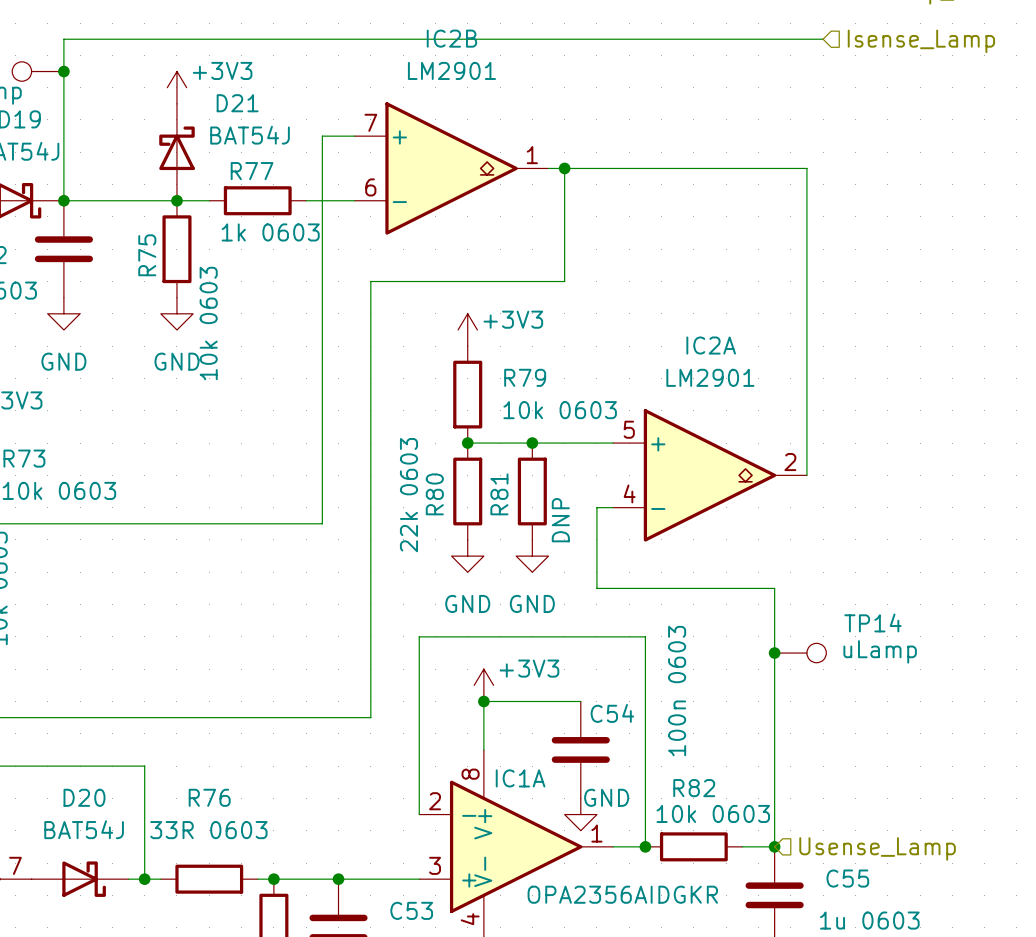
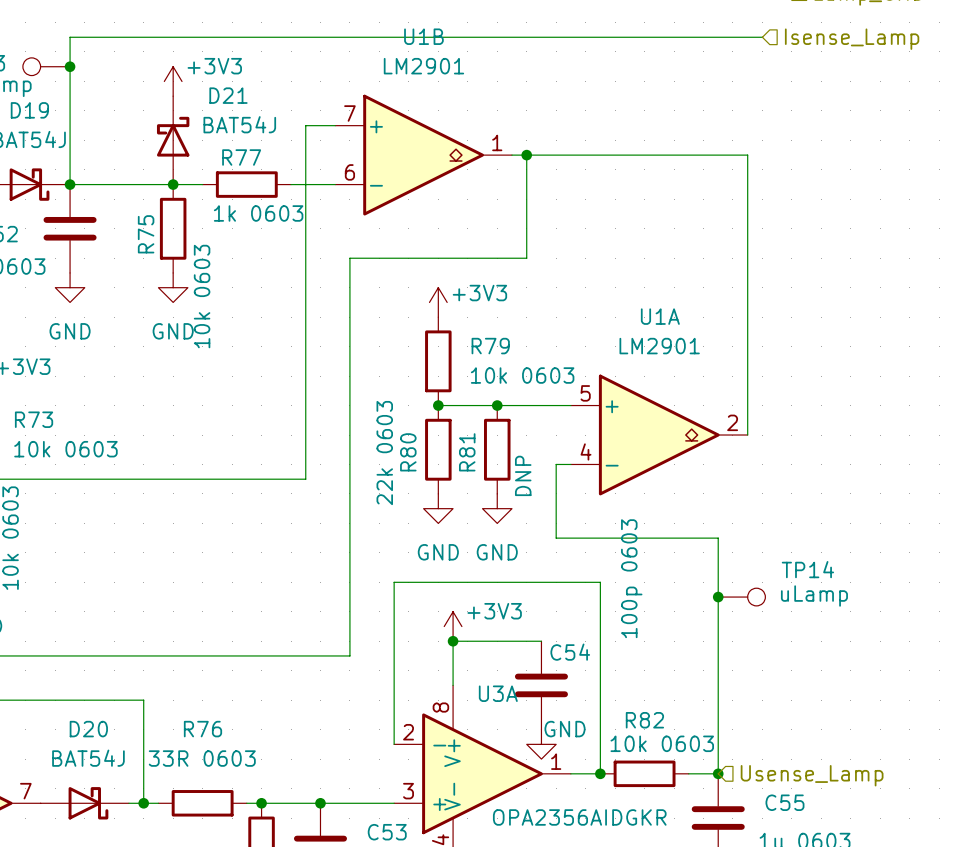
IC2B name: IC2B (451, 38) -> U1B (423, 36)
IC2A name: IC2A (711, 345) -> U1A (660, 316)
C54 value: 100n 0603 (677, 691) -> 100p 0603 (631, 578)
IC1A name: IC1A (520, 778) -> U3A (498, 693)

